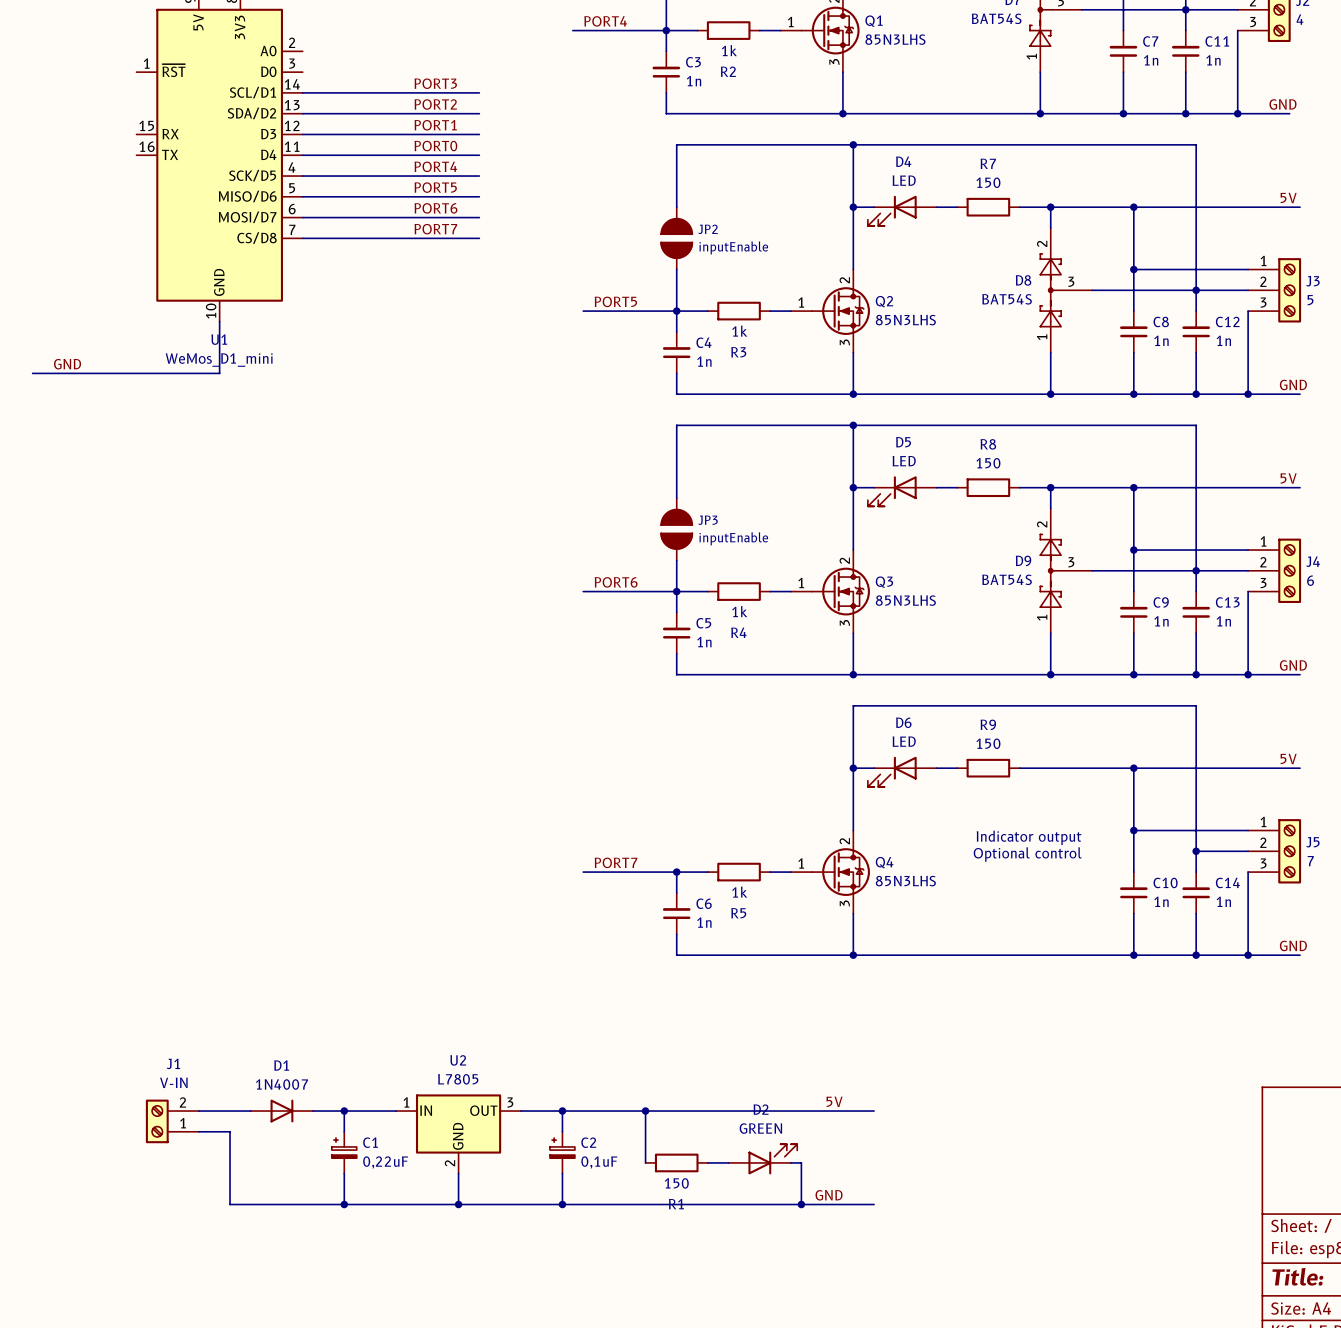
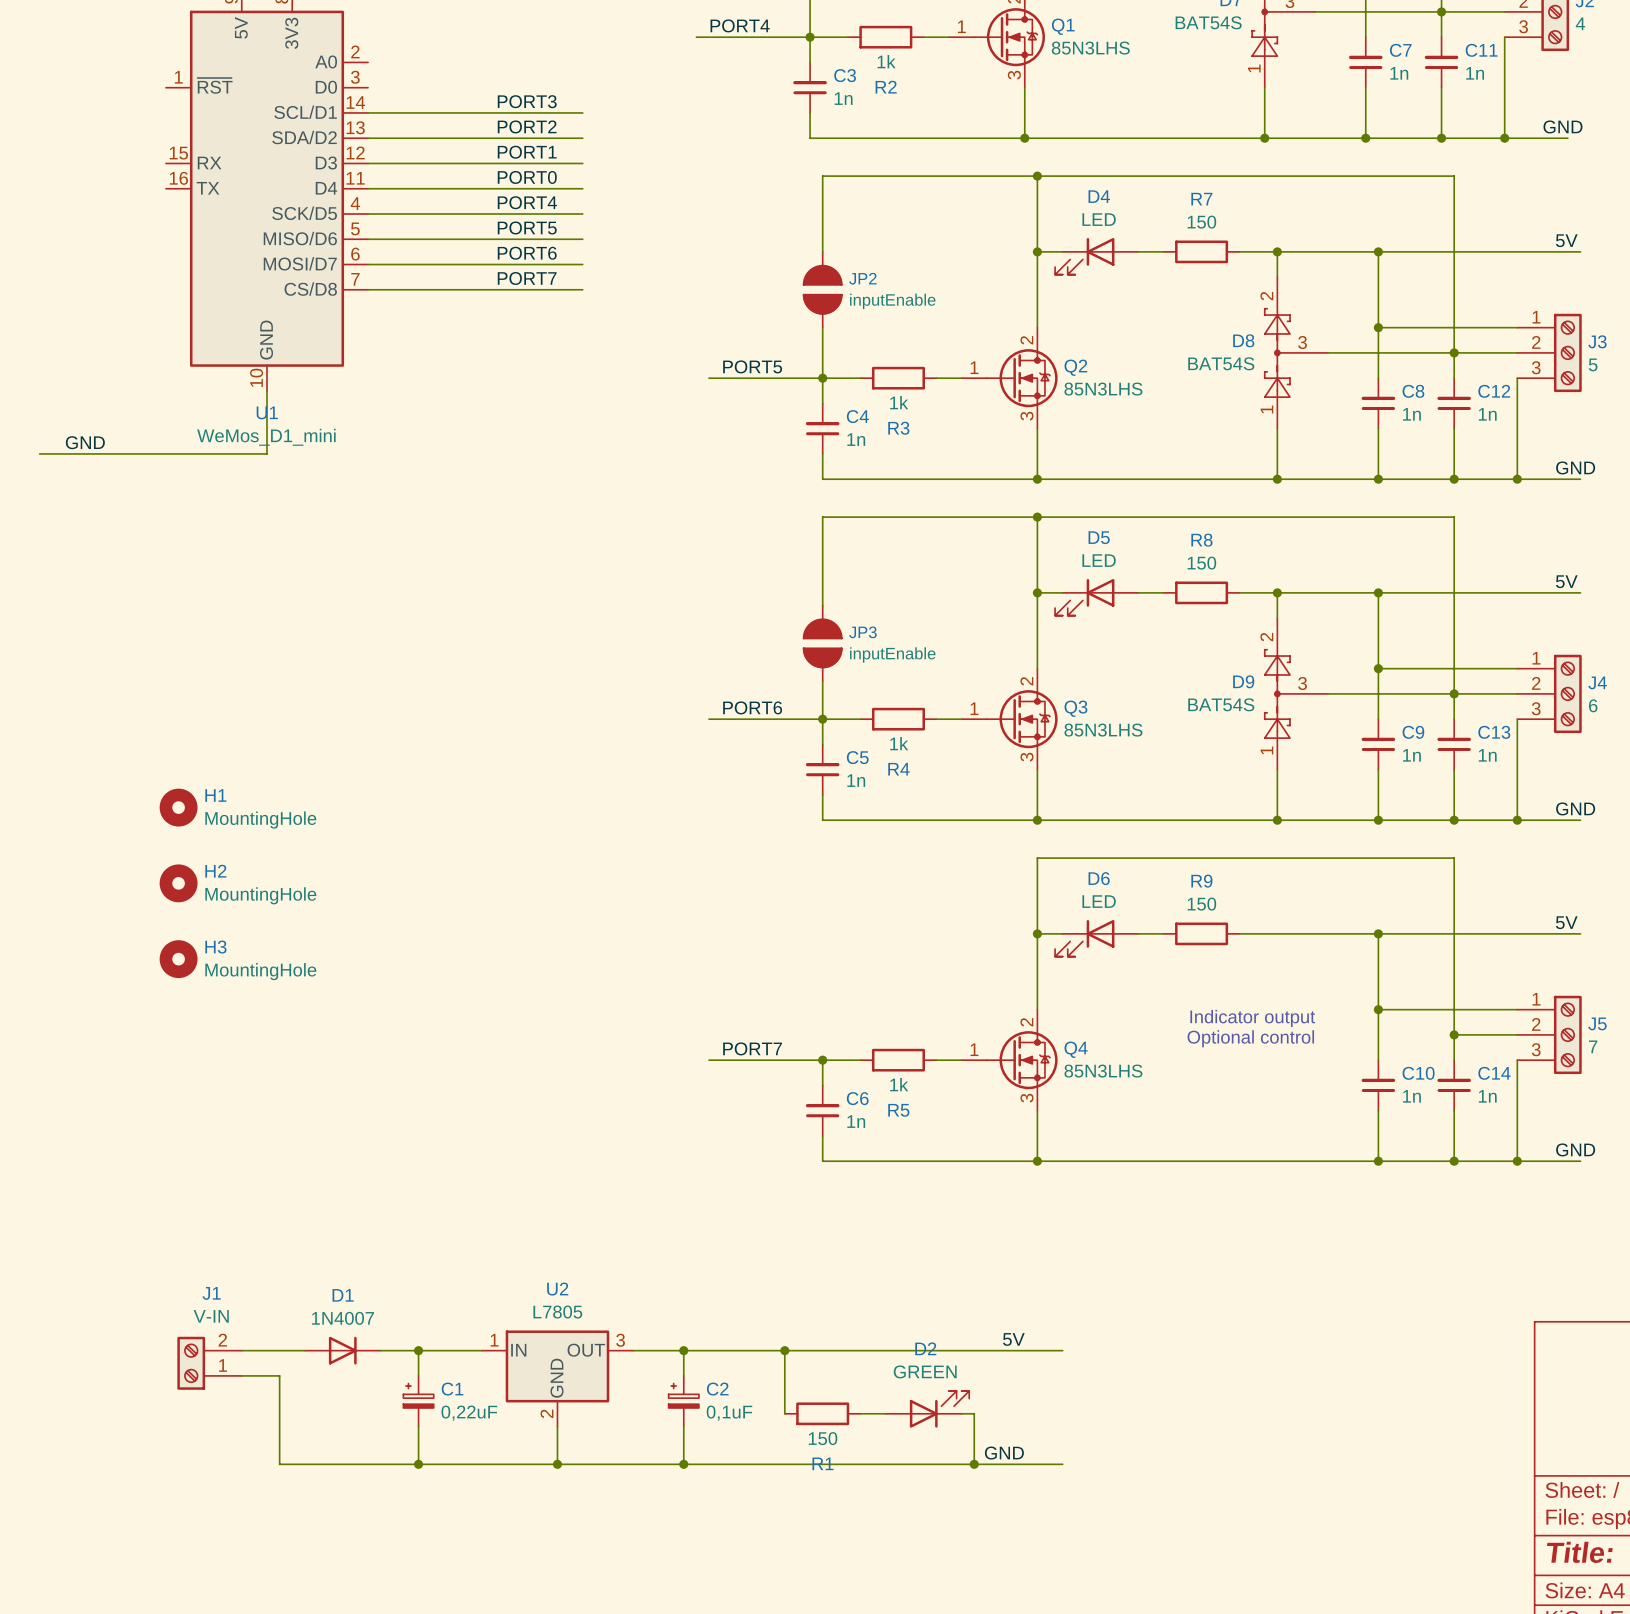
H1: none -> MountingHole (178, 807)
H2: none -> MountingHole (178, 883)
H3: none -> MountingHole (178, 959)

